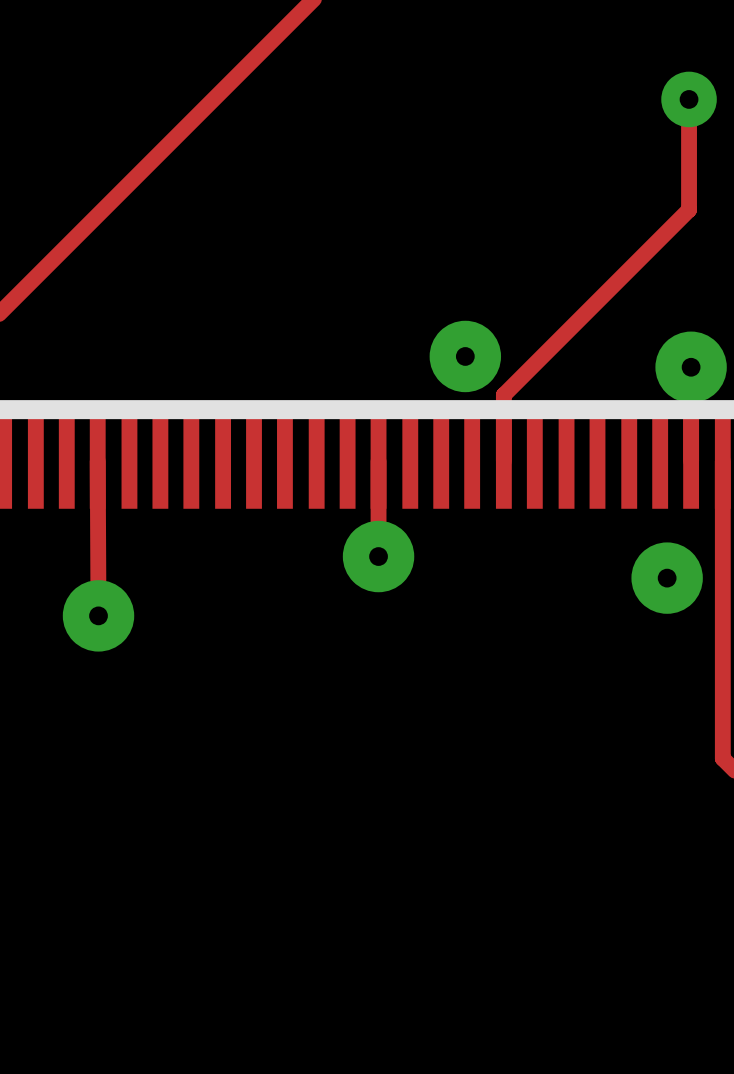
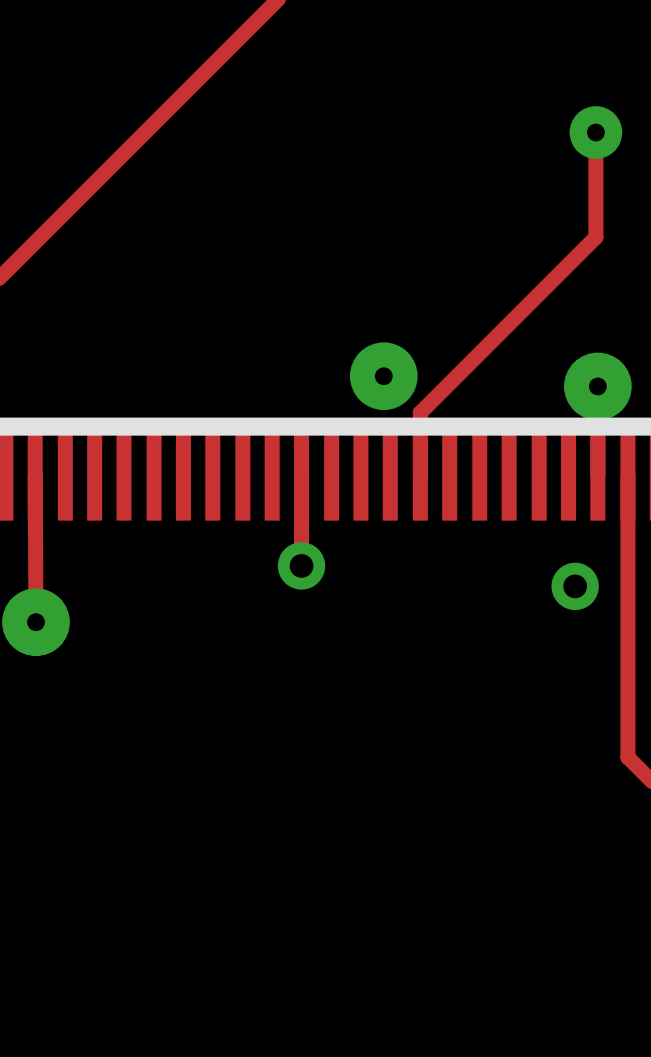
via size: [342, 520, 415, 593] -> [277, 542, 326, 590]
via size: [631, 542, 703, 614] -> [551, 562, 599, 611]

